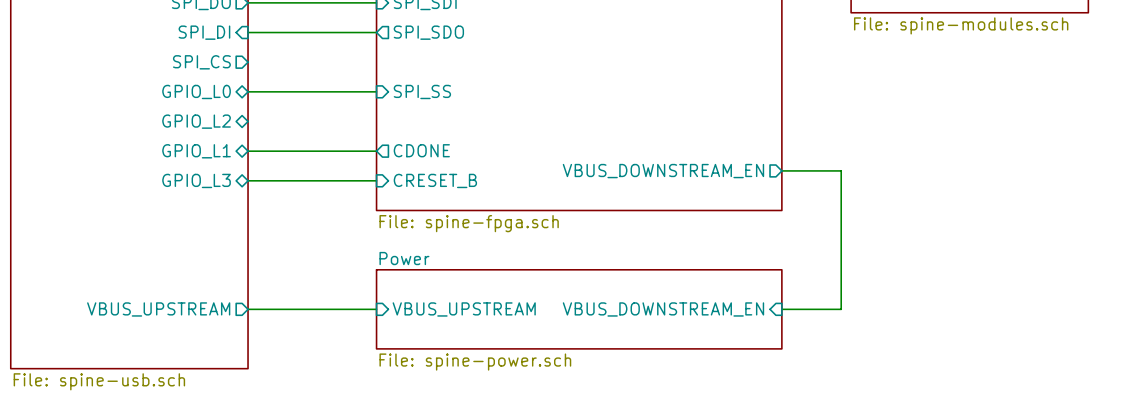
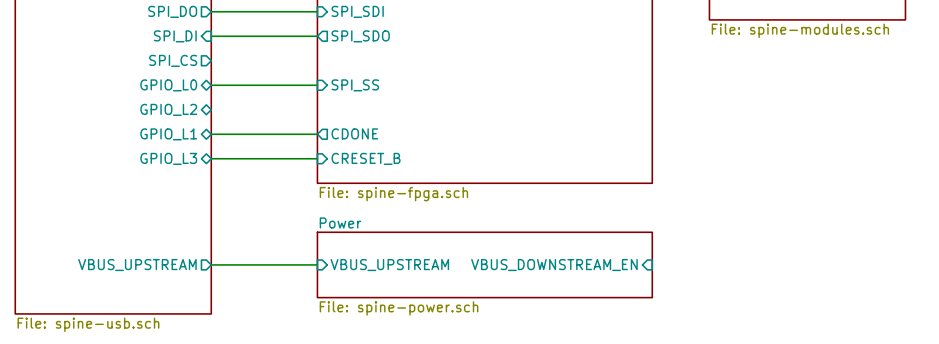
wire: (781, 170) (841, 170) (841, 309) (781, 309) -> none
sheet pin: VBUS_DOWNSTREAM_EN (663, 171) -> none

